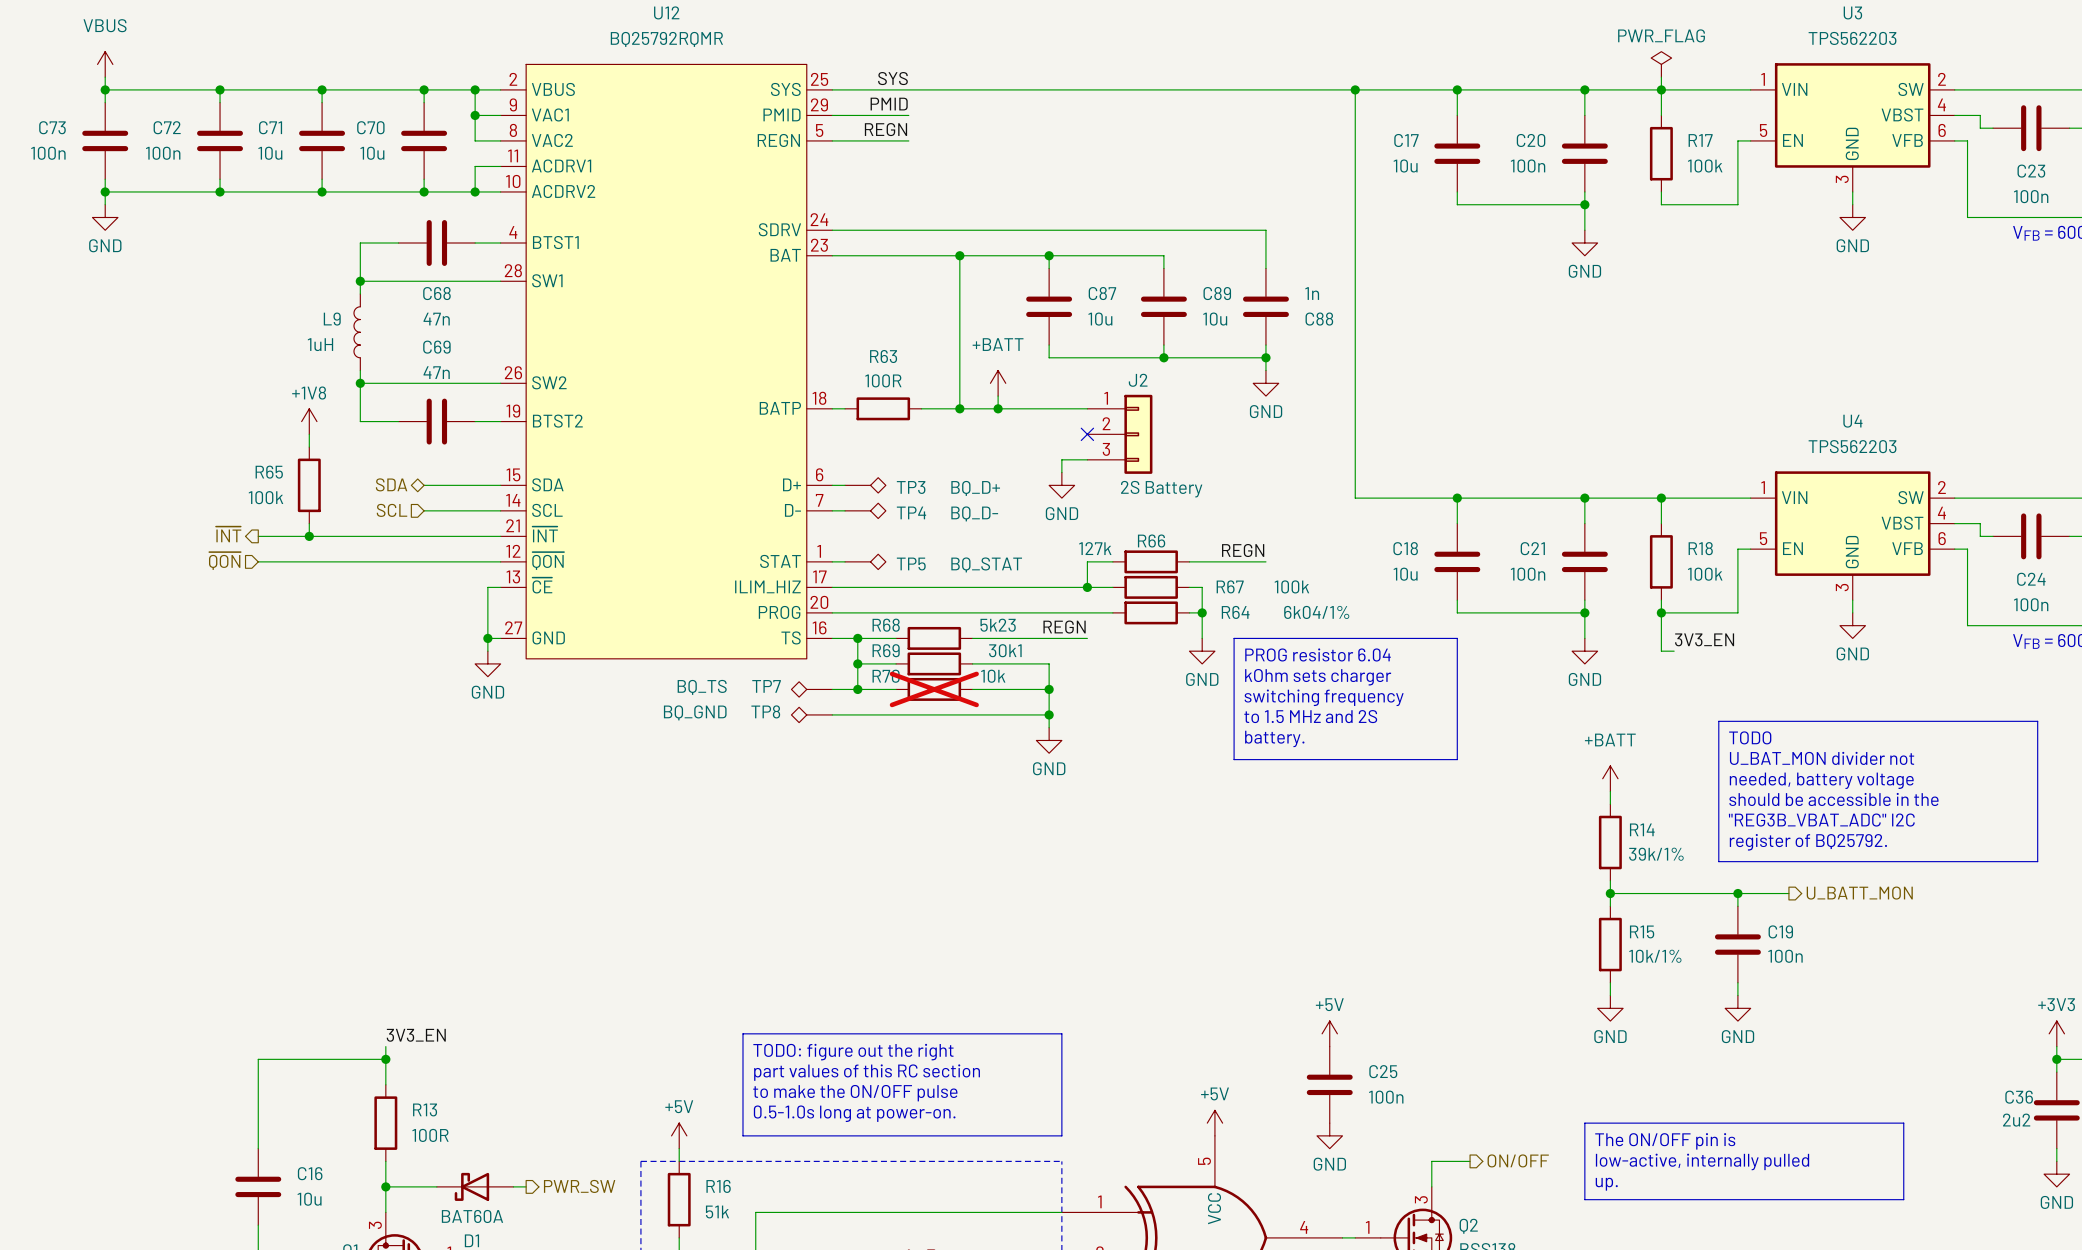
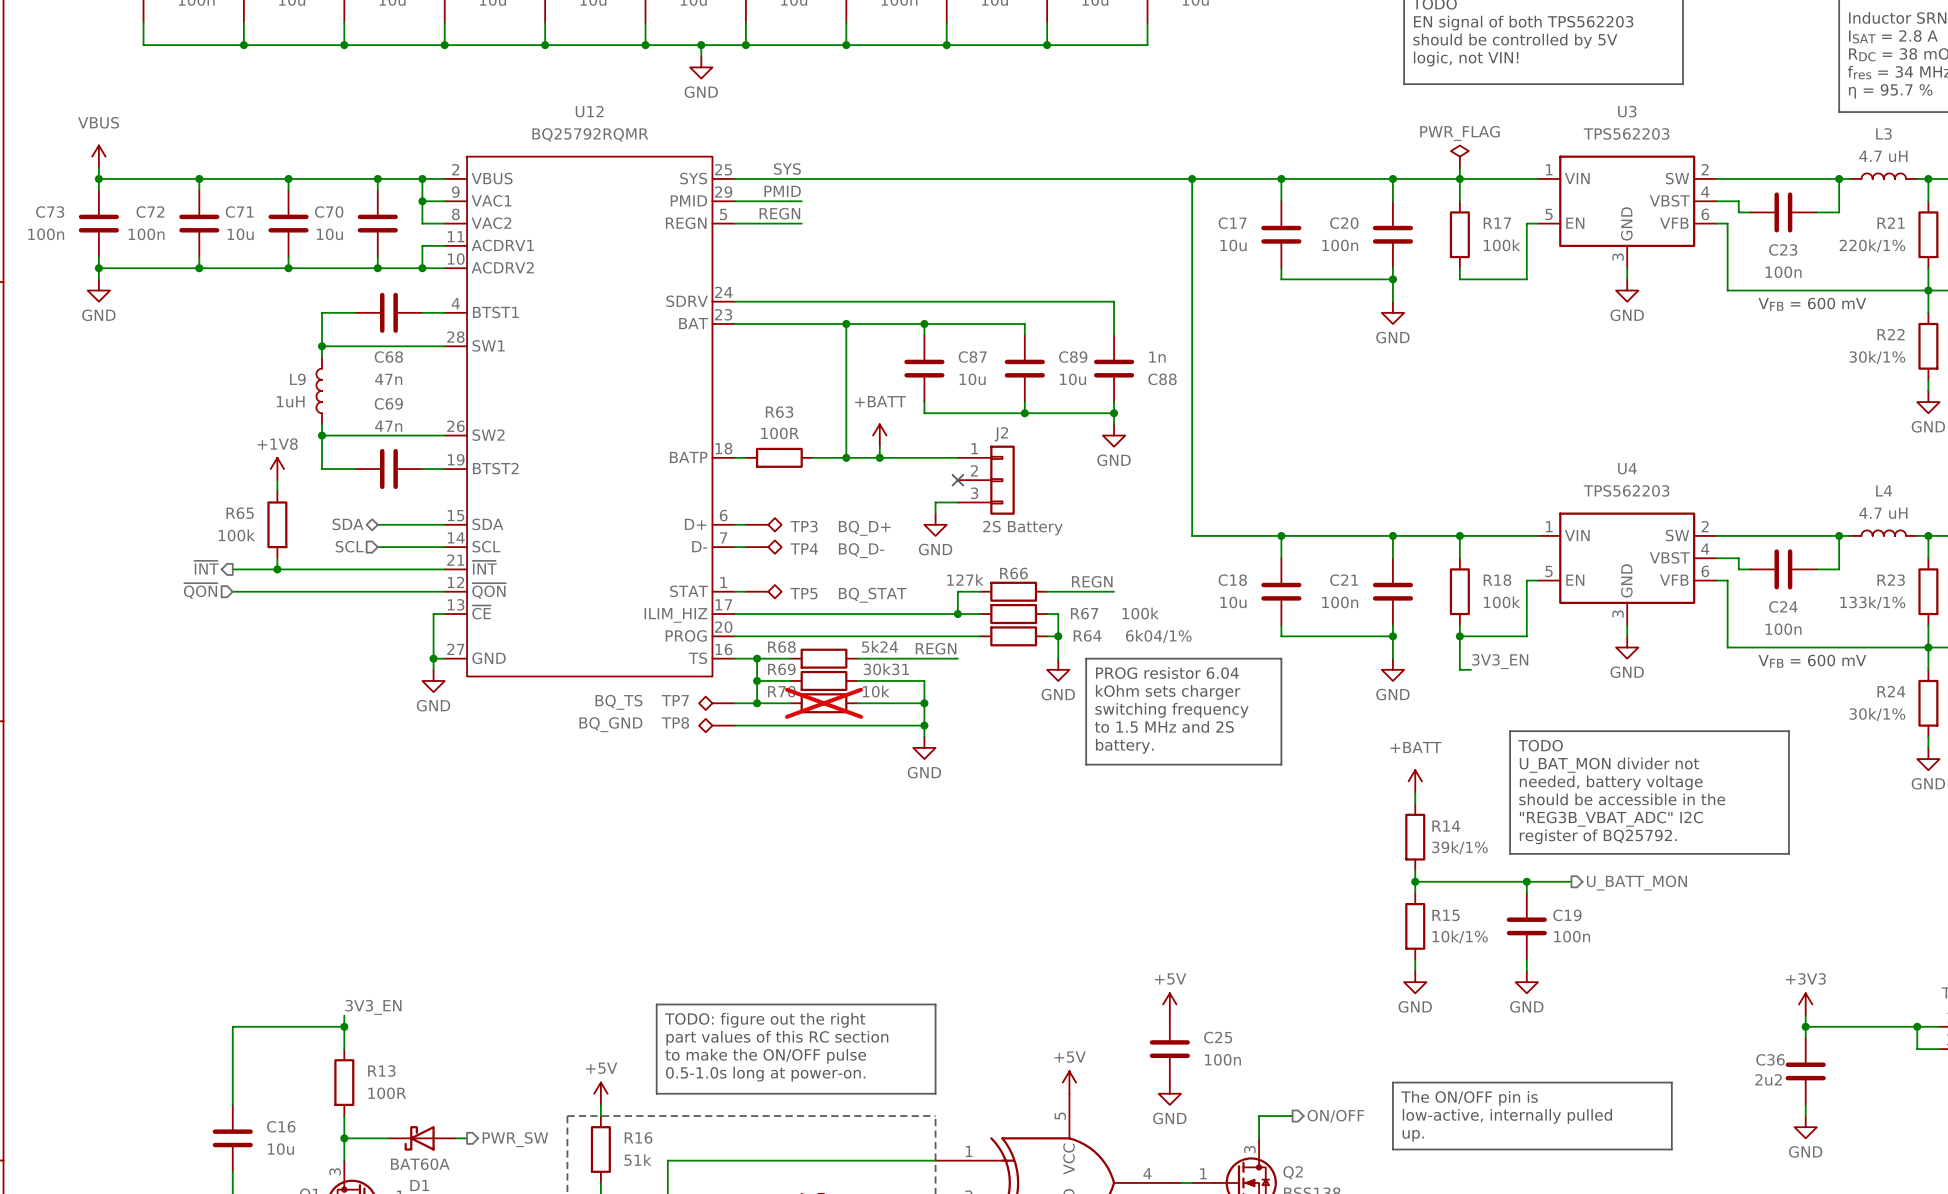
R68 value: 5k23 (998, 625) -> 5k24 (879, 646)
R69 value: 30k1 (1005, 650) -> 30k31 (886, 669)

